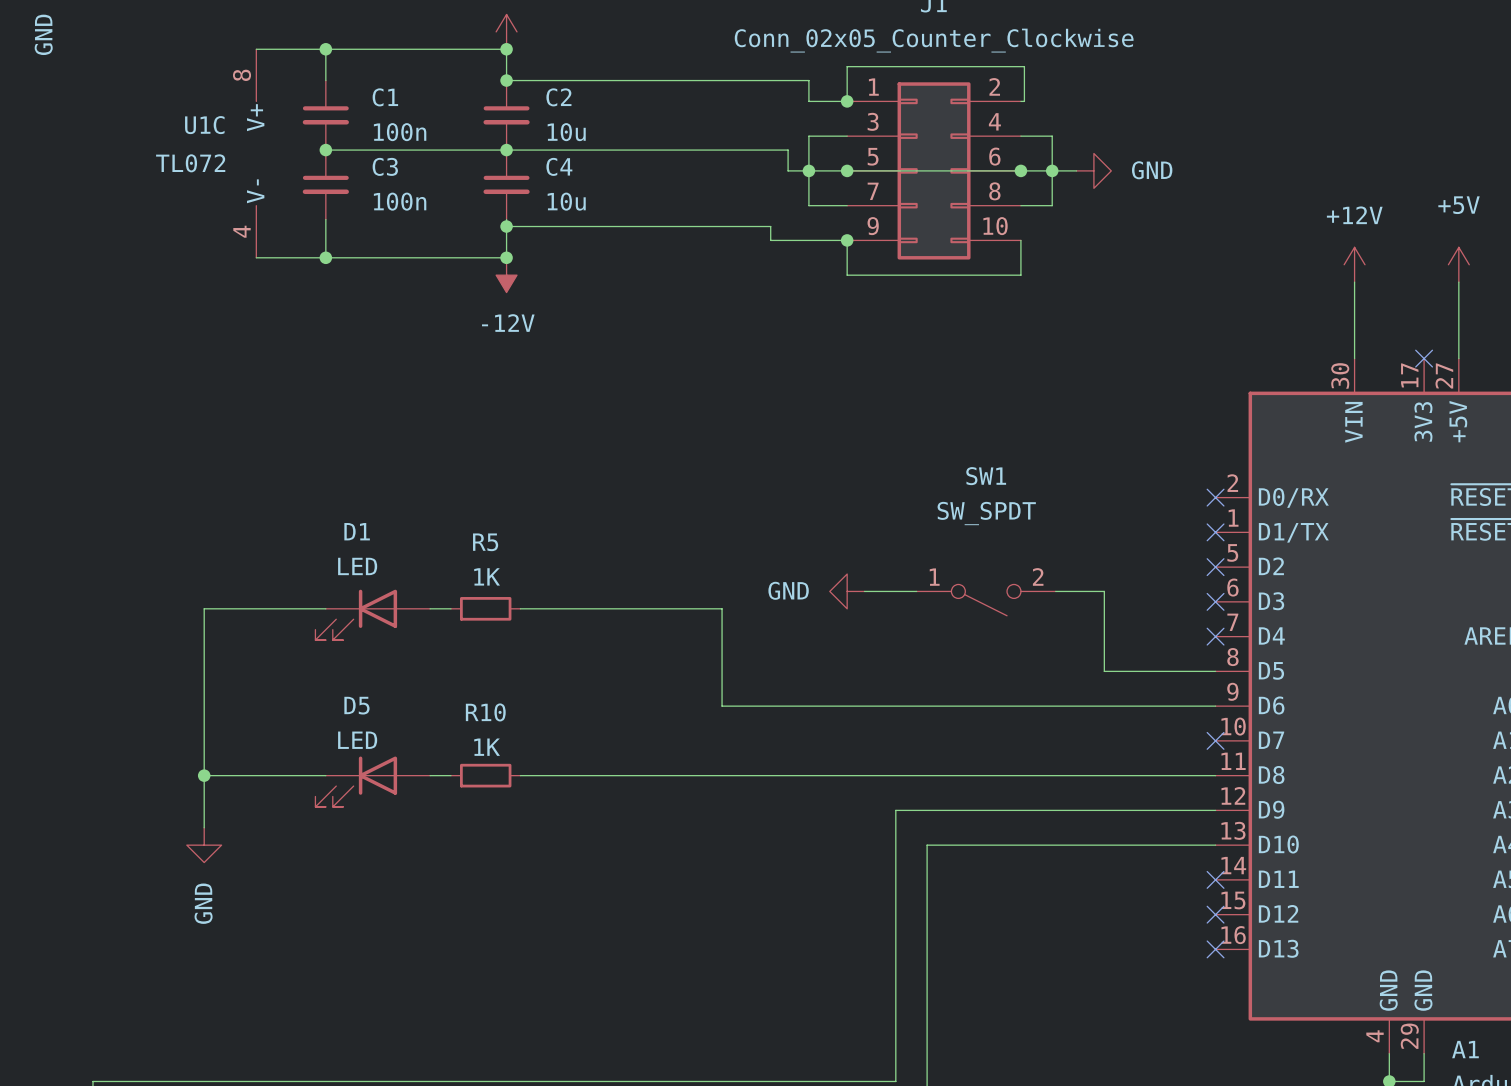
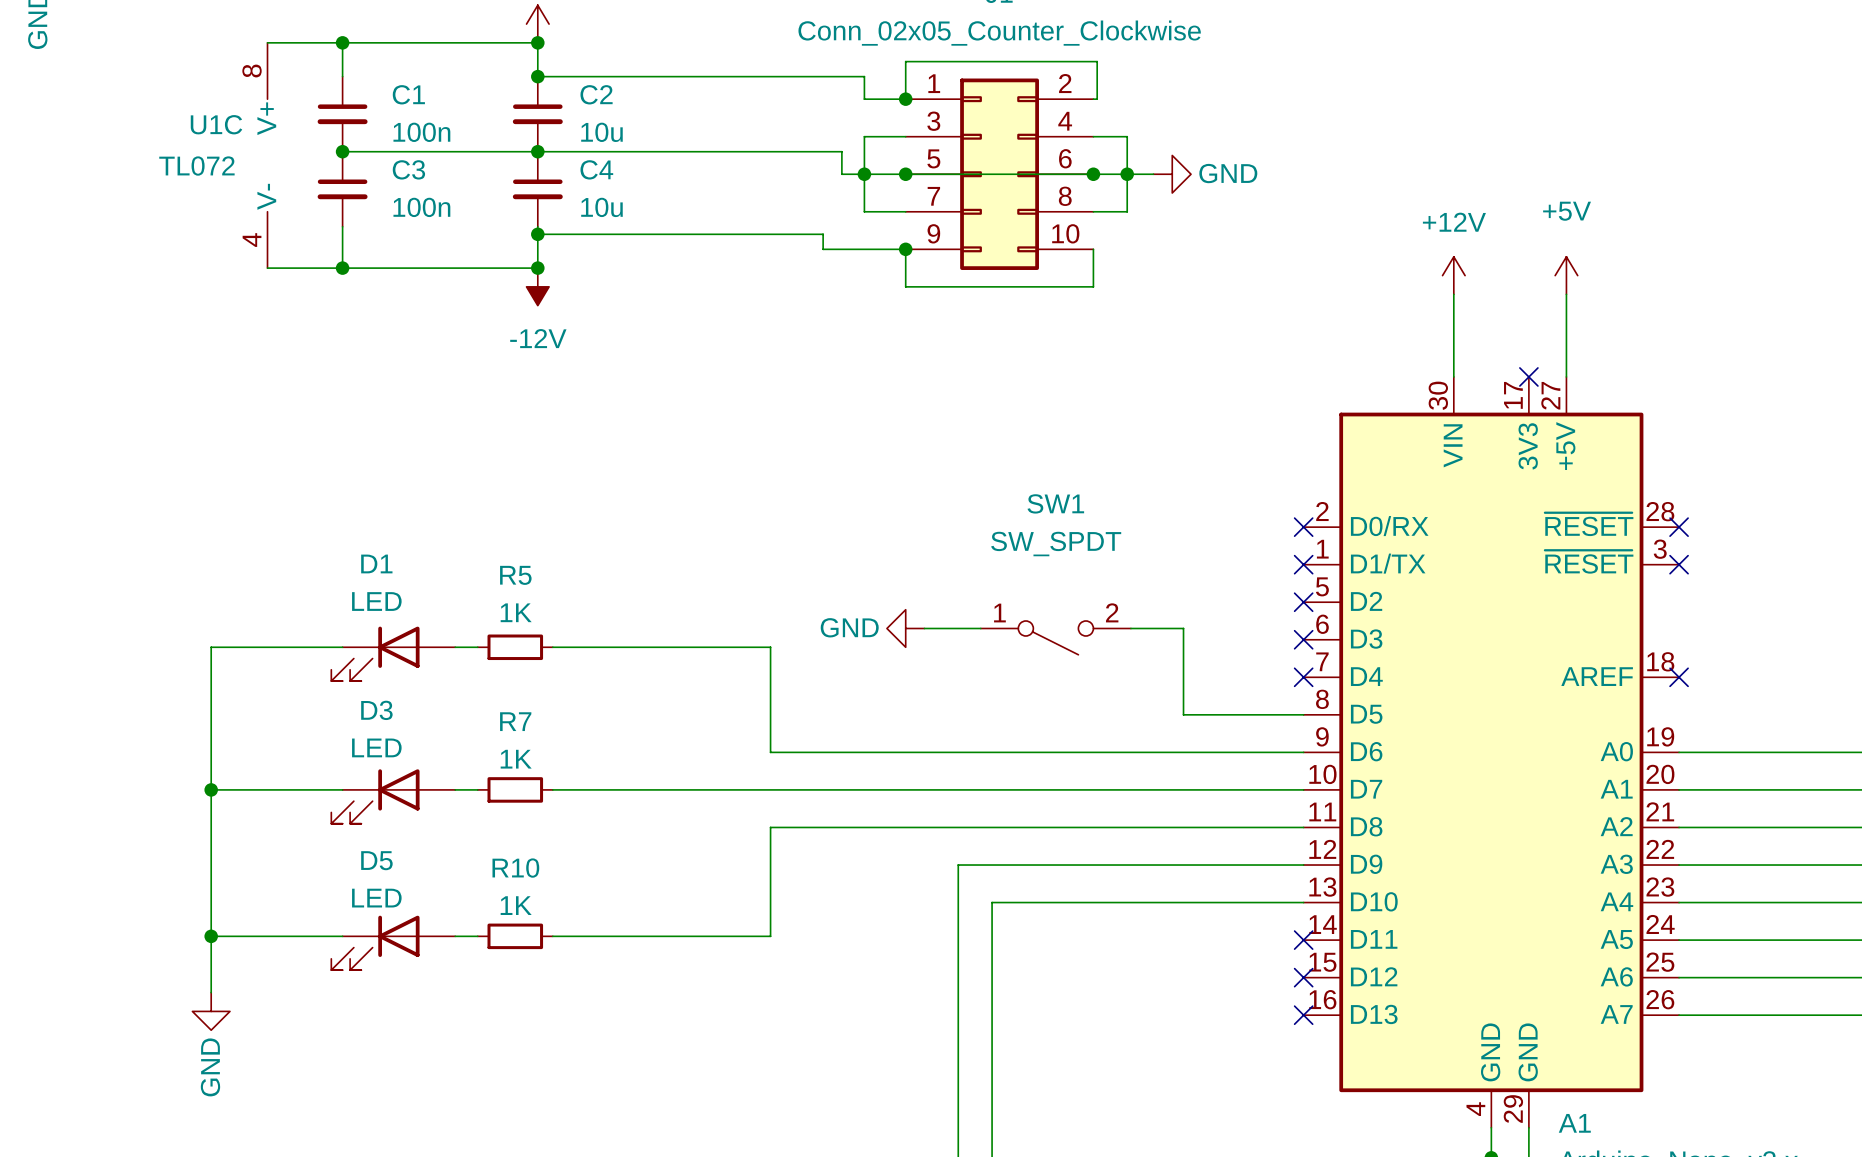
R7: none -> 1K (515, 789)
wire: none -> (552, 789) (1303, 789)
no-connect mark: (1215, 740) -> none
D3: none -> LED (393, 796)
wire: (204, 775) (325, 775) -> (211, 789) (342, 789)
junction position: (204, 775) -> (211, 789)
wire: (430, 775) (450, 775) -> (455, 789) (477, 789)
R10 position: (485, 775) -> (515, 936)
wire: (520, 775) (722, 775) -> (552, 936) (770, 936) (770, 827)
D5 position: (372, 781) -> (393, 942)
wire: none -> (211, 883) (211, 992)
power symbol position: GND (204, 845) -> GND (211, 1011)
wire: none -> (211, 936) (342, 936)
junction: none -> (211, 936)
wire: none -> (455, 936) (477, 936)

